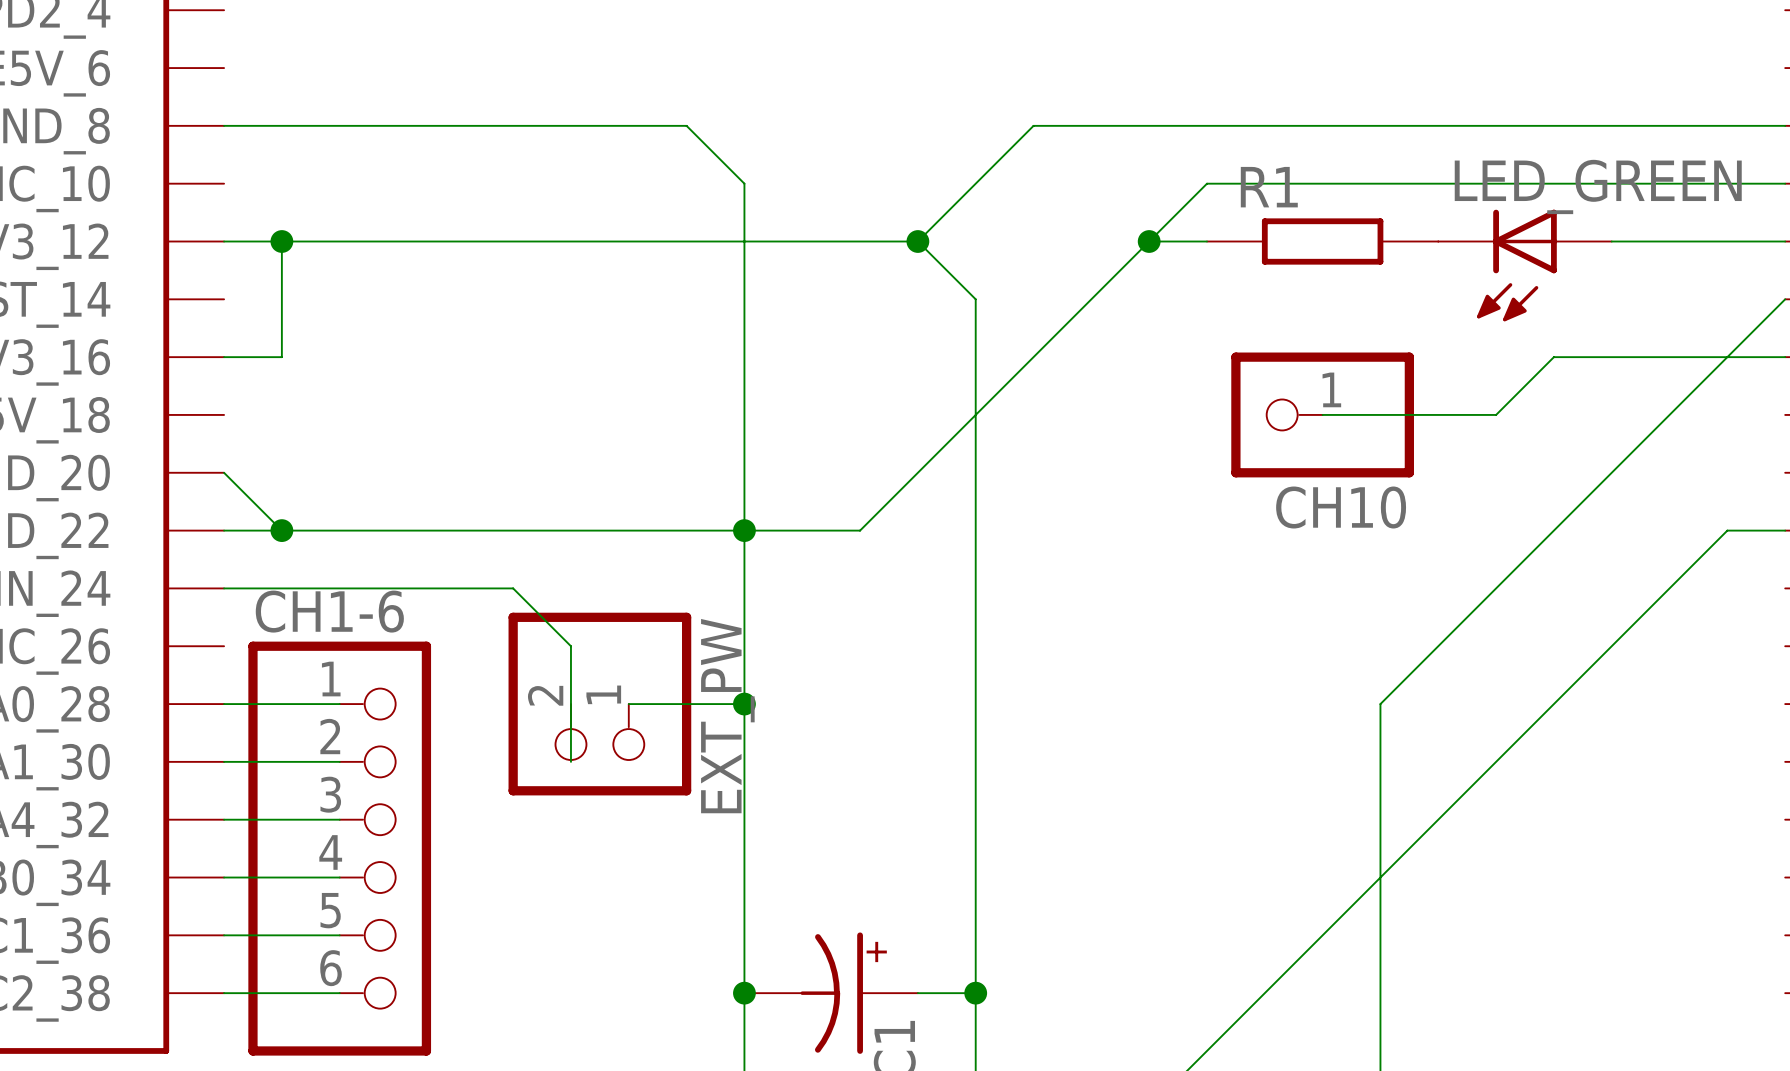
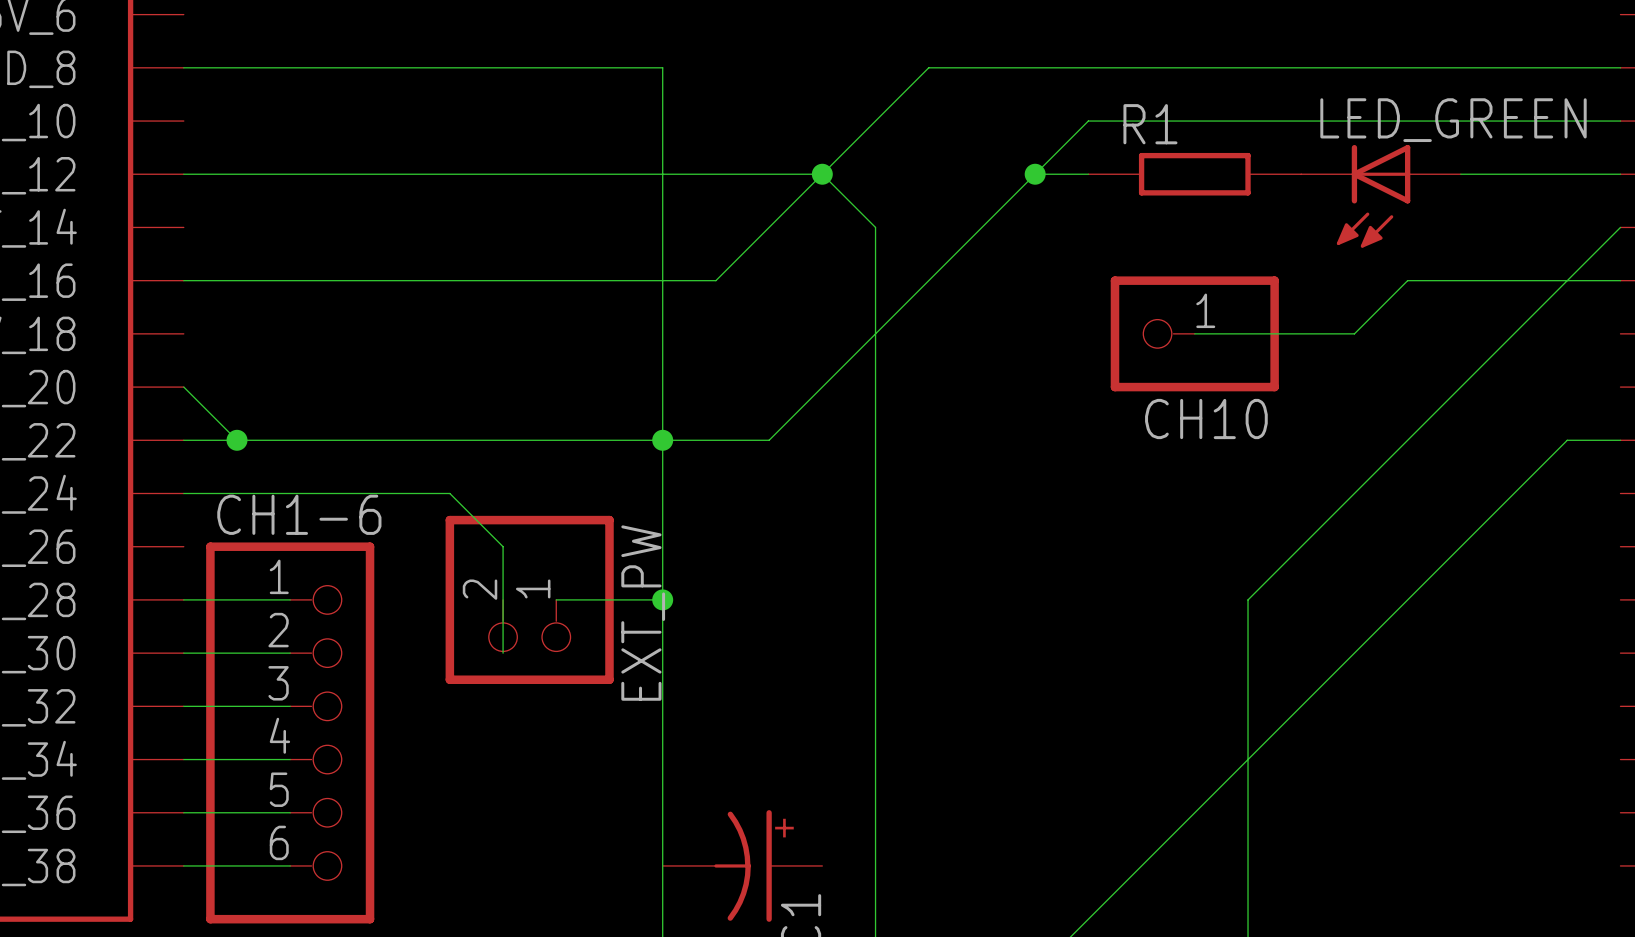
wire: (686, 125) (744, 183) -> (609, 67) (662, 67) (662, 121)
wire: (281, 241) (281, 357) -> (822, 174) (715, 280) (237, 280)
junction: (281, 241) -> none
junction: (744, 993) -> none
wire: (917, 993) (975, 993) -> none
junction: (975, 993) -> none

